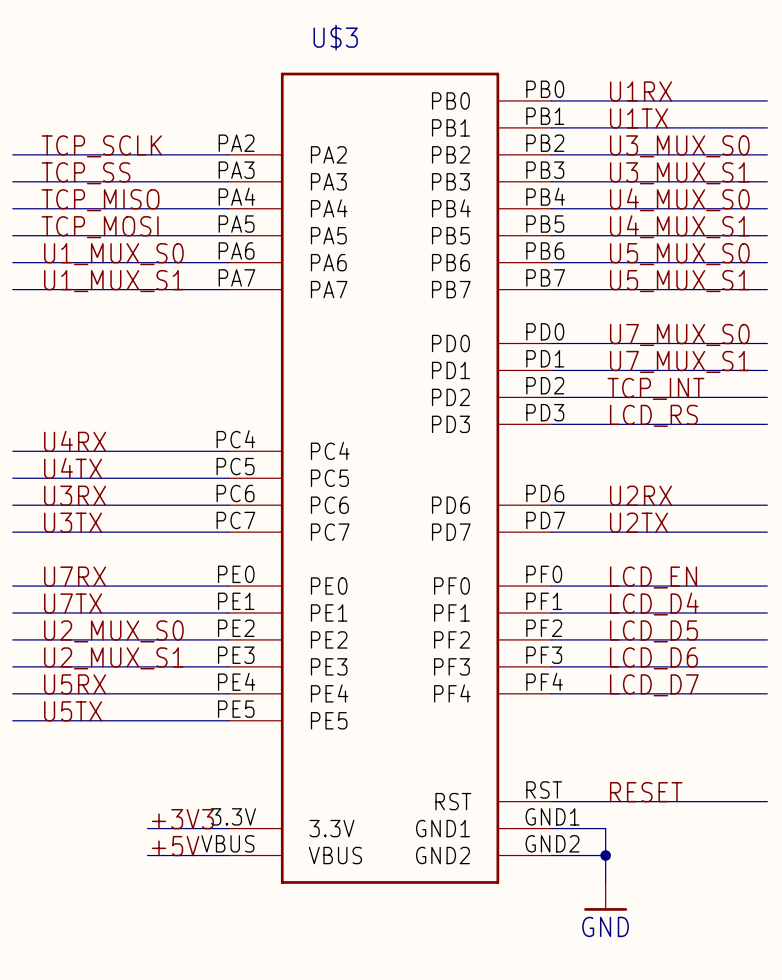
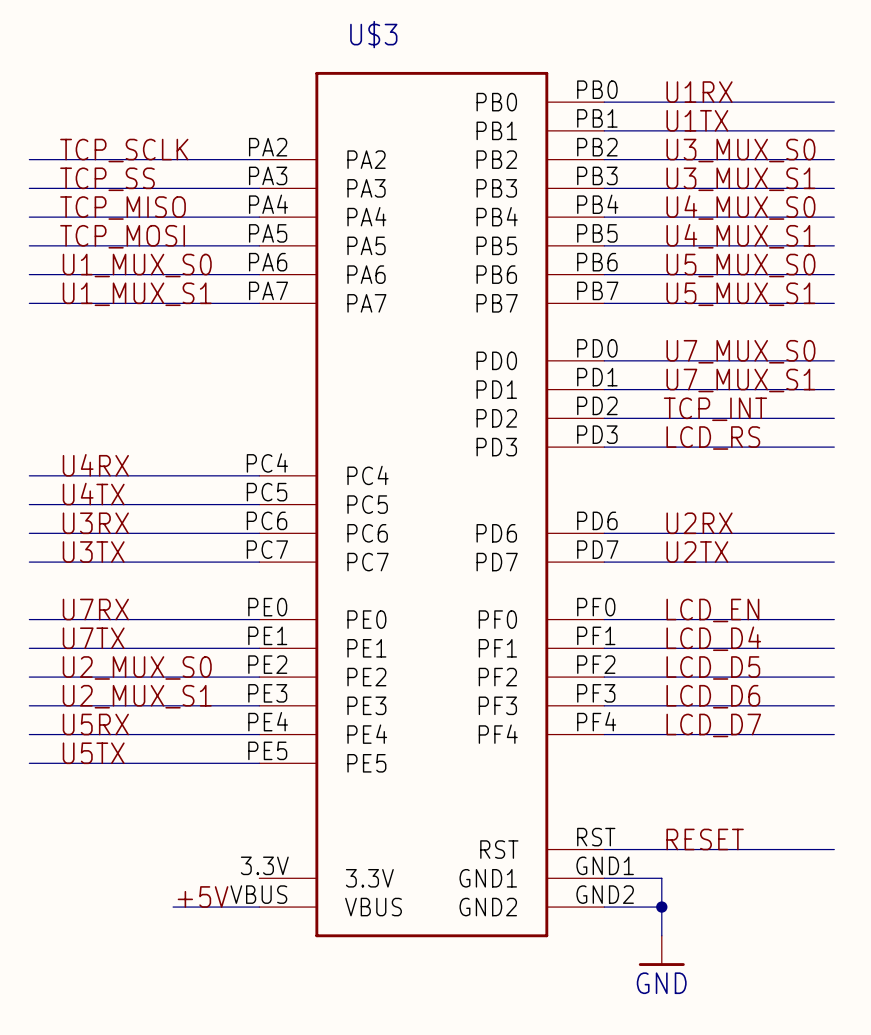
label: +3V3 (182, 819) -> none
wire: (147, 828) (228, 828) -> none

